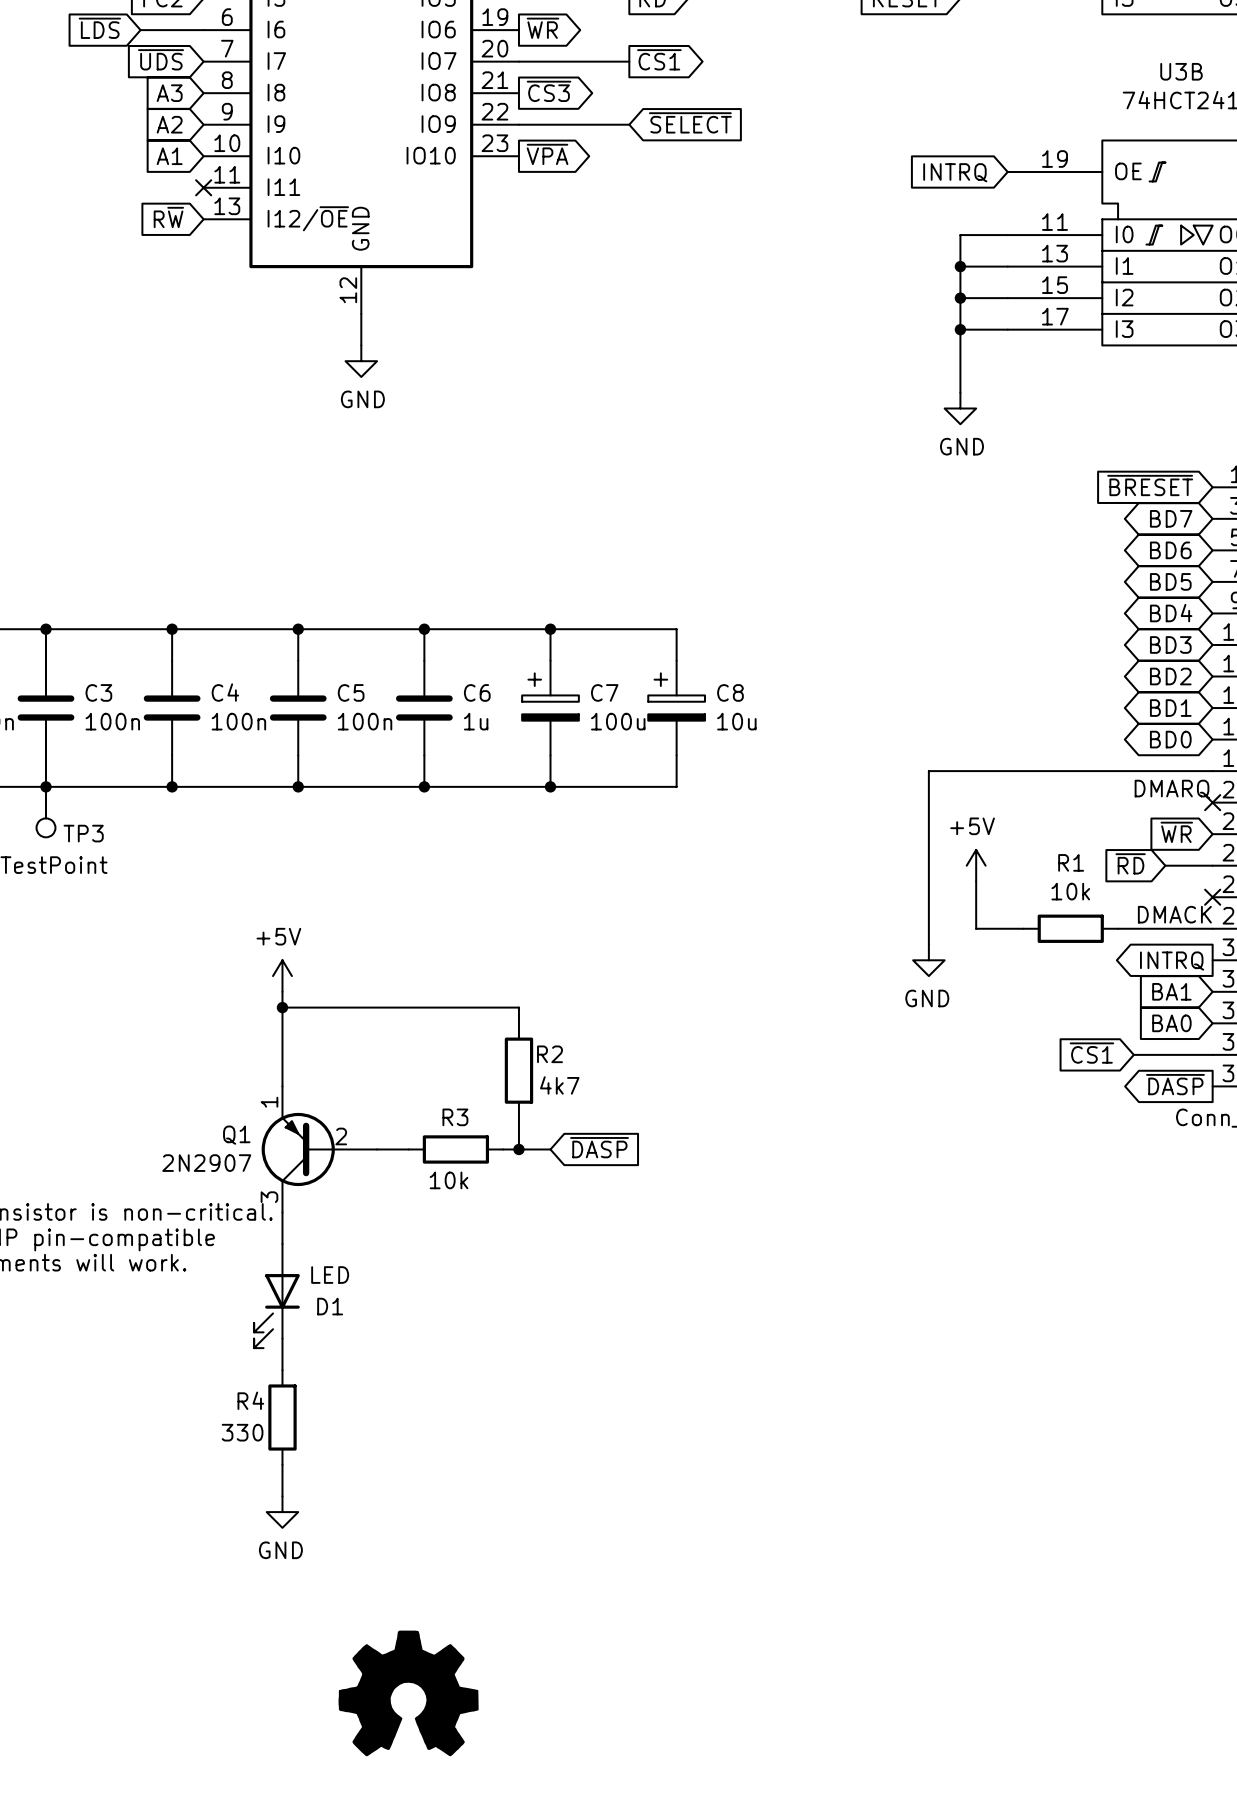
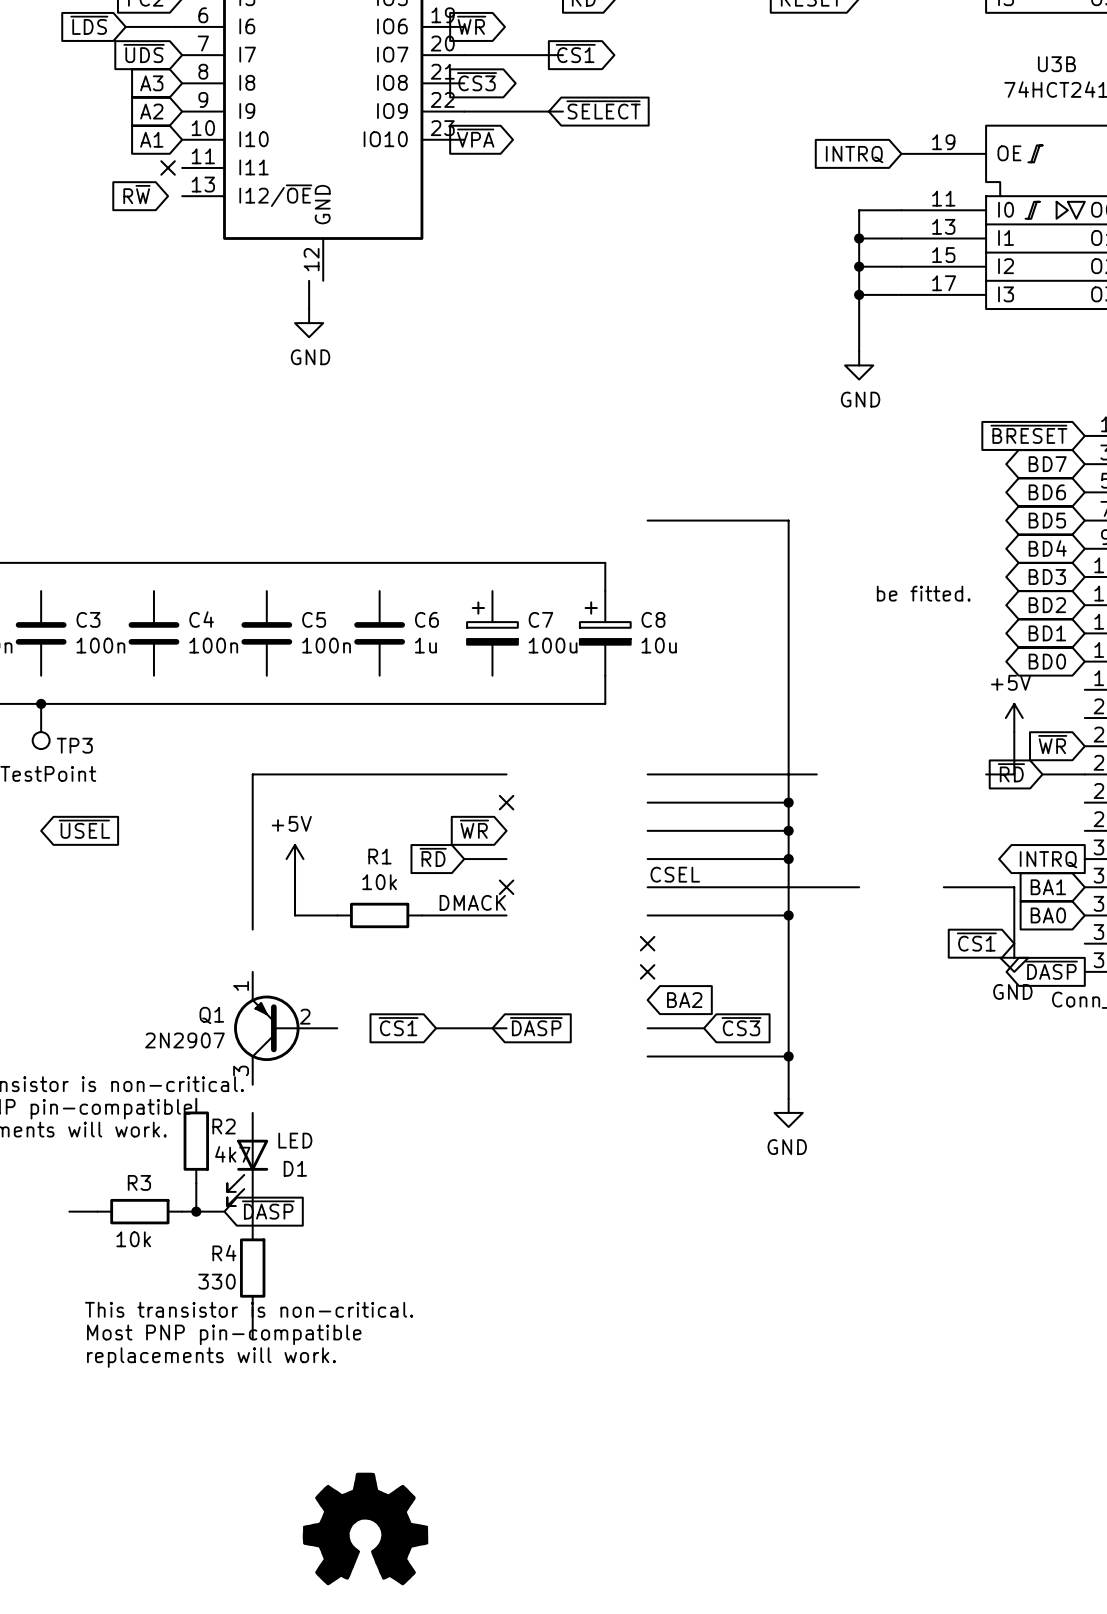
global label position: ~{WR} (543, 28) -> ~{WR} (471, 25)
global label position: ~{CS1} (659, 59) -> ~{CS1} (575, 53)
global label position: ~{CS3} (549, 91) -> ~{CS3} (477, 81)
global label position: ~{SELECT} (690, 122) -> ~{SELECT} (603, 109)
global label position: ~{VPA} (547, 154) -> ~{VPA} (475, 138)
no-connect mark position: (203, 187) -> (168, 167)
global label position: R~{W} (168, 217) -> R~{W} (136, 194)
wire: (361, 313) (361, 345) -> (309, 280) (309, 309)
power symbol position: GND (361, 361) -> GND (309, 323)
wire: none -> (647, 520) (788, 520) (788, 1098)
wire: (45, 629) (45, 660) -> none
junction: (45, 629) -> none
wire: (172, 629) (172, 660) -> none
junction: (172, 629) -> none
wire: (298, 629) (298, 660) -> none
junction: (298, 629) -> none
wire: (424, 629) (424, 660) -> none
junction: (424, 629) -> none
wire: (550, 629) (550, 660) -> none
junction: (550, 629) -> none
text: none -> be fitted. (923, 593)
wire: (45, 755) (45, 786) -> none
wire: (172, 755) (172, 786) -> none
wire: (298, 755) (298, 786) -> none
wire: (424, 755) (424, 786) -> none
wire: (550, 755) (550, 786) -> none
wire: (1212, 771) (928, 771) (928, 944) -> none
junction: (172, 786) -> none
junction: (298, 786) -> none
junction: (424, 786) -> none
junction: (550, 786) -> none
label: DMARQ (1172, 789) -> none
no-connect mark: (1212, 802) -> none
wire: none -> (1014, 732) (1014, 774) (986, 774)
wire: none -> (506, 774) (252, 774) (252, 887)
wire: none -> (647, 774) (816, 774)
power symbol position: +5V (976, 865) -> +5V (1014, 718)
wire: (976, 881) (976, 928) (1023, 928) -> none
no-connect mark: none -> (506, 802)
wire: none -> (647, 802) (788, 802)
junction: none -> (788, 802)
no-connect mark: (1212, 897) -> none
label: DMACK (1174, 914) -> none
global label: none -> ~{USEL} (84, 829)
global label: none -> ~{WR} (474, 829)
wire: none -> (647, 830) (788, 830)
junction: none -> (788, 830)
R1 position: (1070, 928) -> (379, 915)
wire: (1118, 928) (1212, 928) -> none
global label: none -> ~{RD} (433, 857)
wire: none -> (464, 859) (506, 859)
wire: none -> (647, 859) (788, 859)
junction: none -> (788, 859)
power symbol: GND (928, 960) -> none
power symbol position: +5V (282, 976) -> +5V (295, 859)
wire: none -> (295, 873) (295, 915) (337, 915)
label: none -> CSEL (675, 874)
no-connect mark: none -> (506, 887)
wire: none -> (647, 887) (859, 887)
wire: (282, 1007) (518, 1007) (518, 1023) -> none
junction: (282, 1007) -> none
label: none -> DMACK (472, 902)
wire: none -> (421, 915) (506, 915)
wire: none -> (647, 915) (788, 915)
junction: none -> (788, 915)
wire: (282, 1039) (282, 1086) -> none
no-connect mark: none -> (647, 943)
wire: (1133, 1054) (1212, 1054) -> (1014, 943) (1014, 887) (943, 887)
R2 position: (518, 1070) -> (196, 1141)
power symbol: none -> GND (1014, 957)
no-connect mark: none -> (647, 971)
wire: (518, 1117) (518, 1149) -> none
global label: none -> BA2 (684, 1000)
global label: none -> ~{CS1} (398, 1026)
global label: none -> ~{CS3} (741, 1026)
wire: (377, 1149) (408, 1149) -> none
R3 position: (455, 1149) -> (139, 1211)
junction: (518, 1149) -> none
wire: none -> (492, 1028) (506, 1028)
wire: none -> (647, 1028) (704, 1028)
wire: none -> (647, 1056) (788, 1056)
junction: none -> (788, 1056)
wire: (282, 1212) (282, 1244) -> (196, 1183) (196, 1211)
power symbol: none -> GND (788, 1112)
global label: none -> ~{DASP} (268, 1210)
wire: none -> (69, 1211) (97, 1211)
wire: none -> (182, 1211) (224, 1211)
junction: none -> (196, 1211)
text: none -> This transistor is non-critical. (249, 1309)
text: none -> Most PNP pin-compatible (224, 1334)
power symbol: GND (282, 1512) -> none
text: none -> replacements will work. (211, 1357)
power symbol position: (408, 1693) -> (365, 1528)

